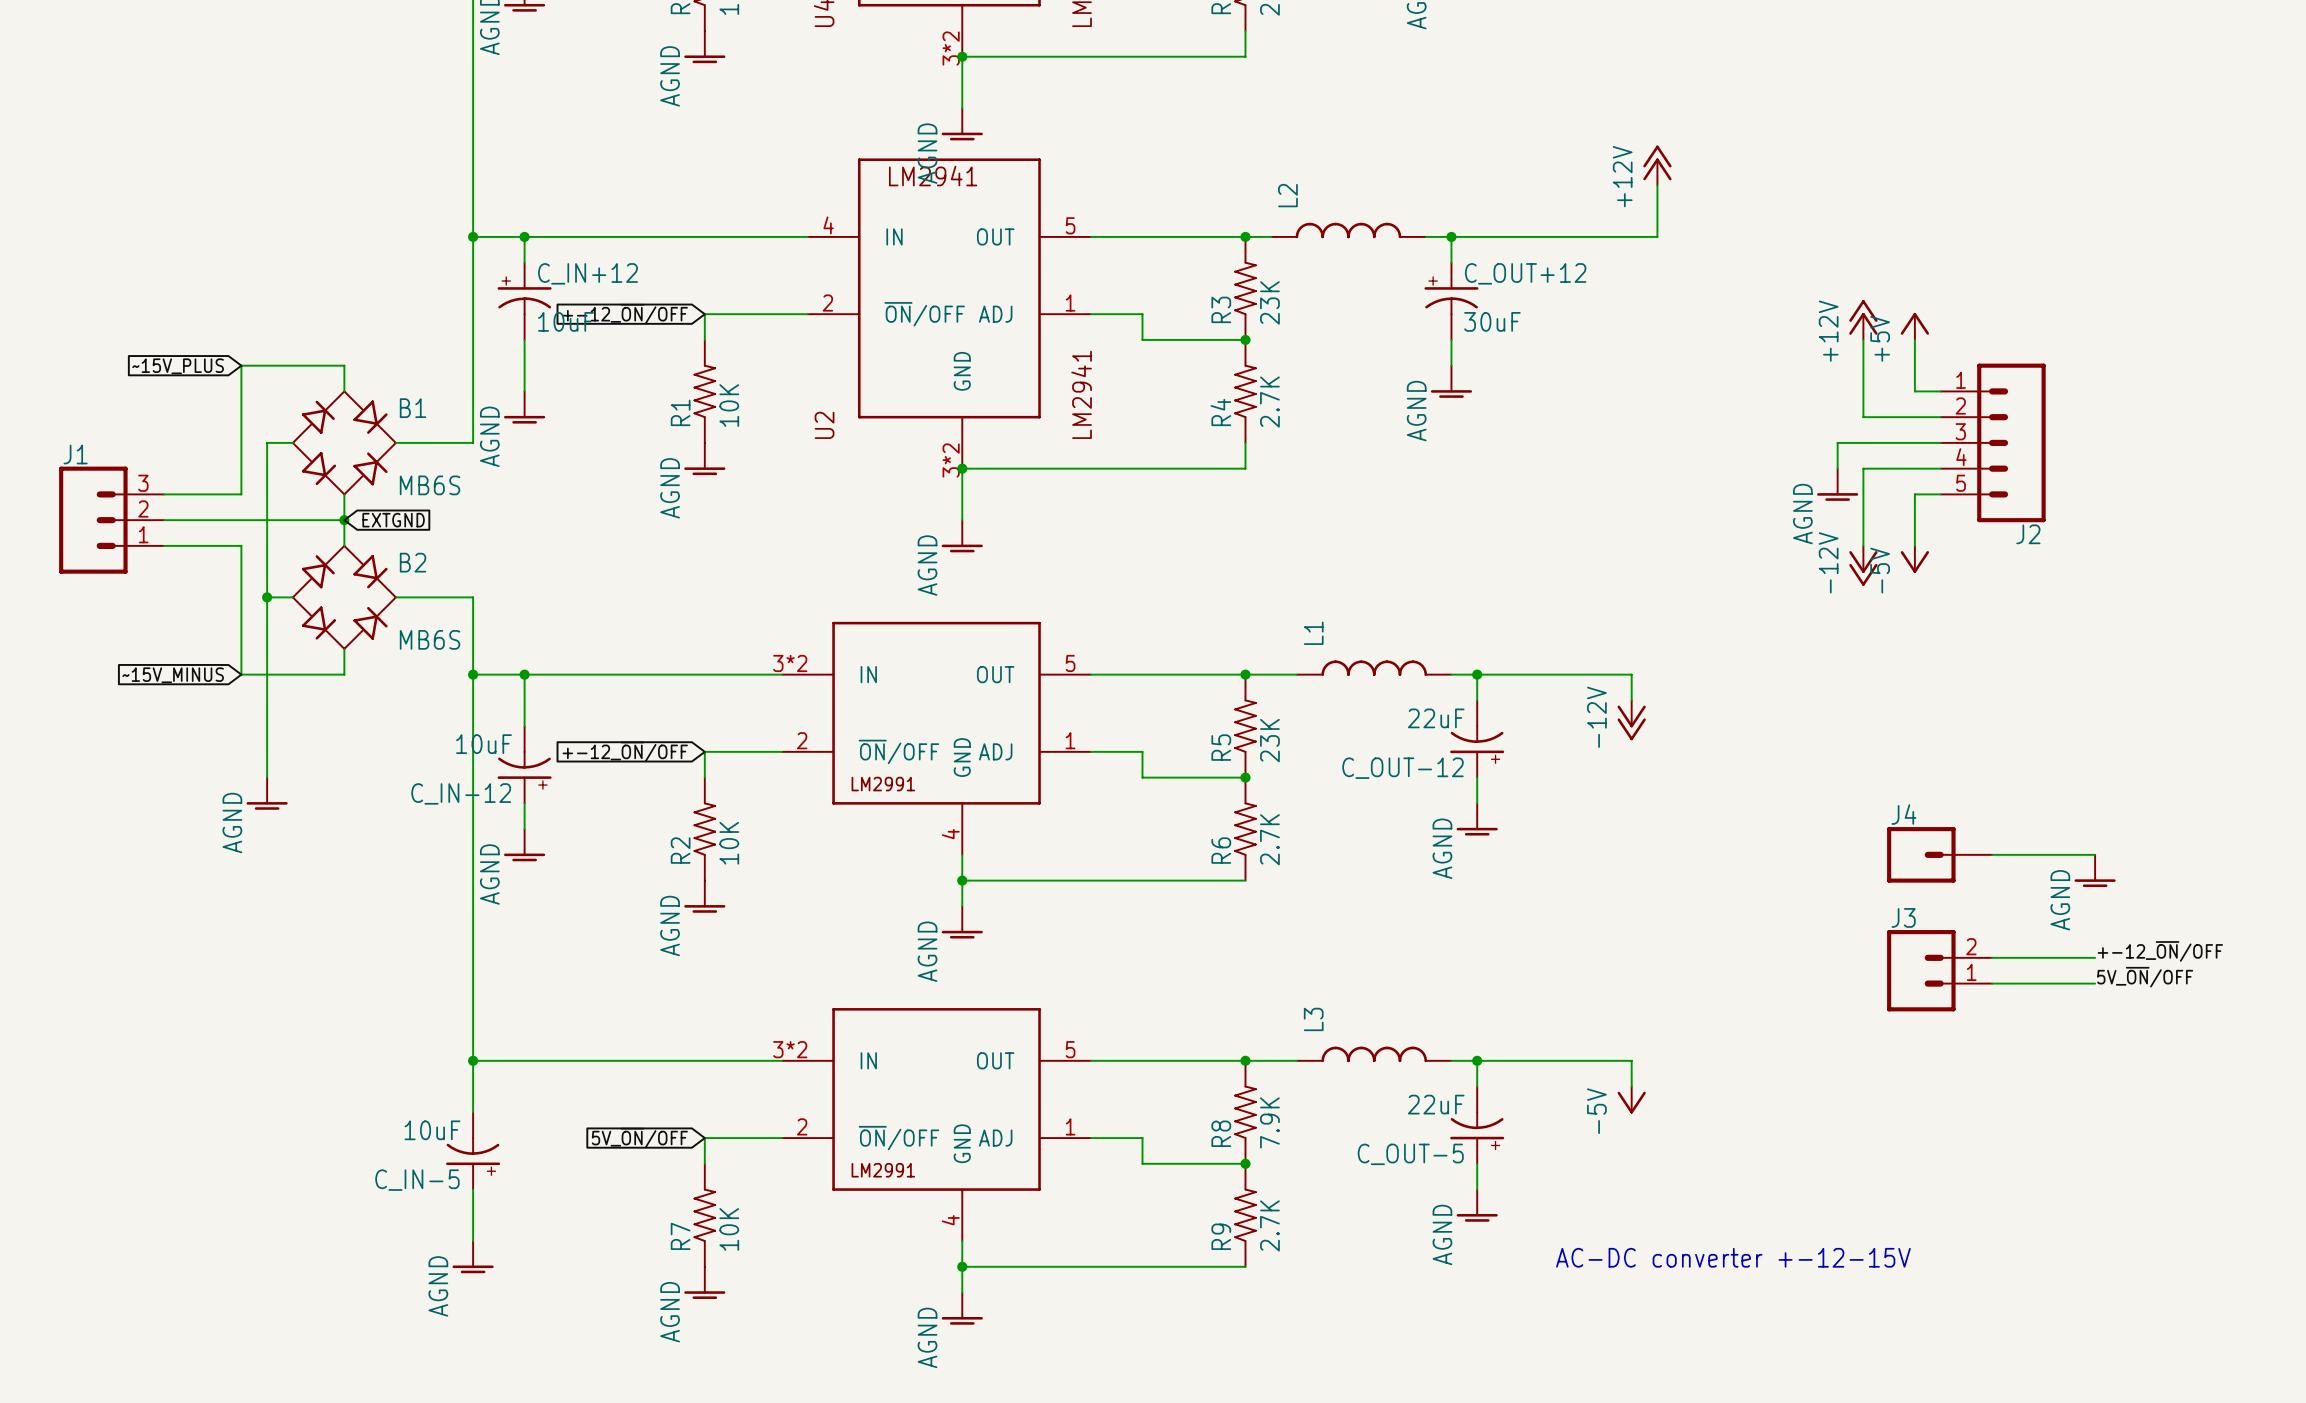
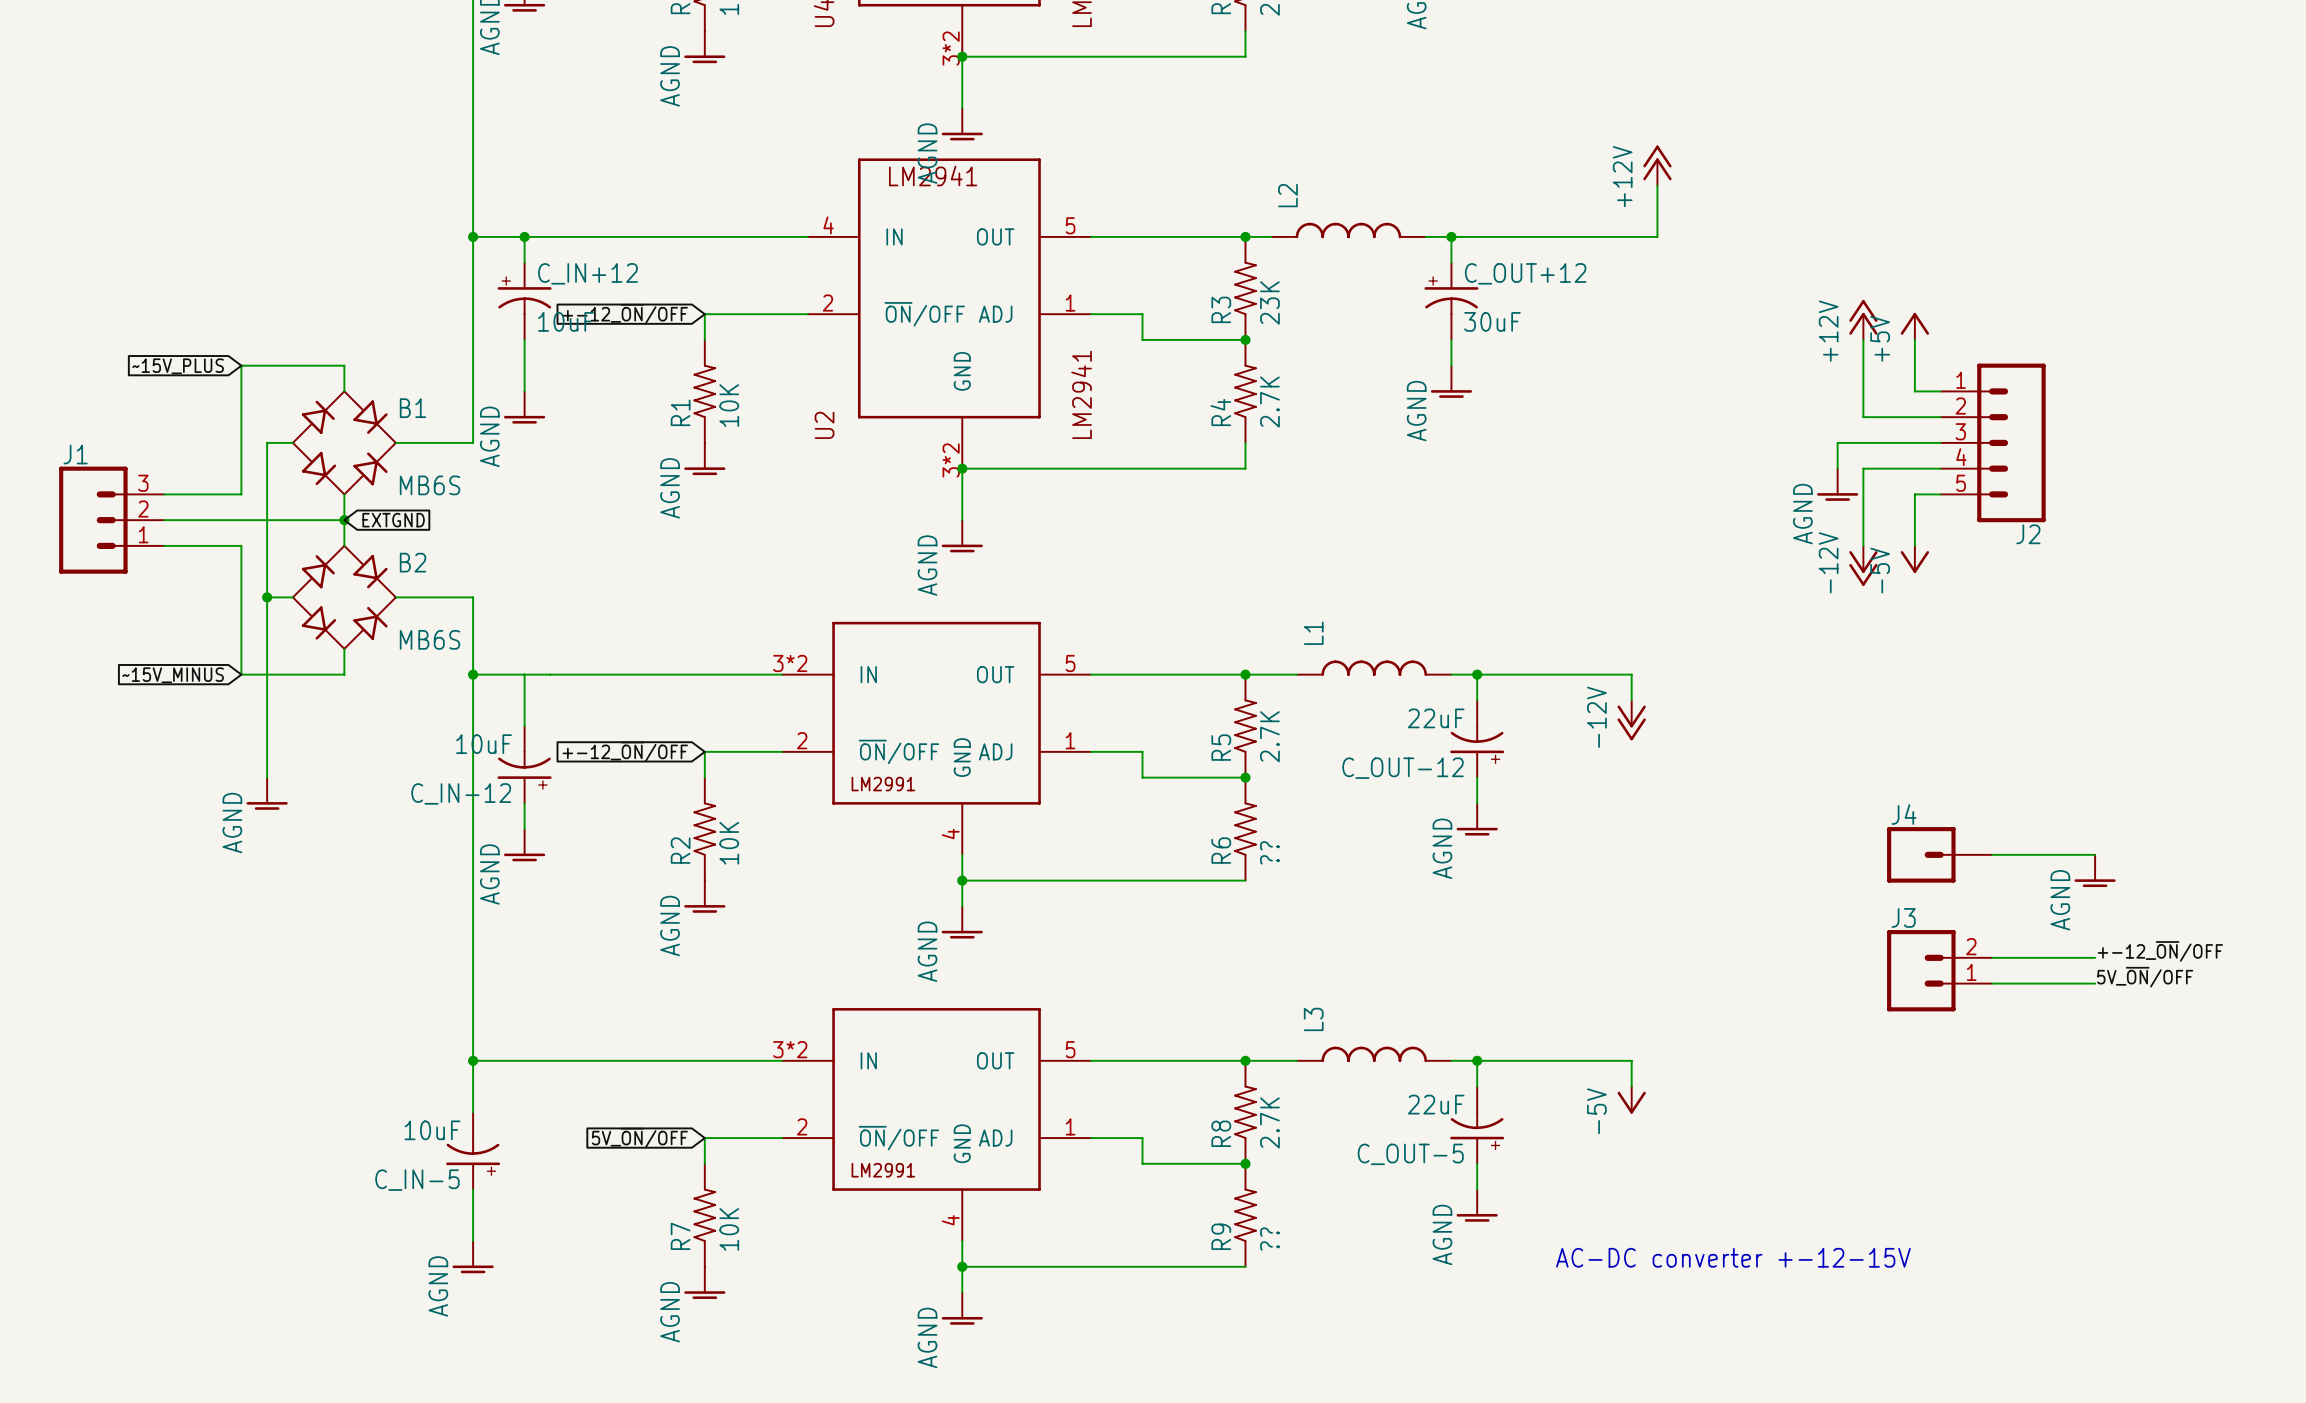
junction: (524, 674) -> none
R5 value: 23K (1269, 740) -> 2.7K (1269, 736)
R6 value: 2.7K (1269, 839) -> ?? (1269, 852)
R8 value: 7.9K (1269, 1122) -> 2.7K (1269, 1122)
R9 value: 2.7K (1269, 1225) -> ?? (1269, 1239)

